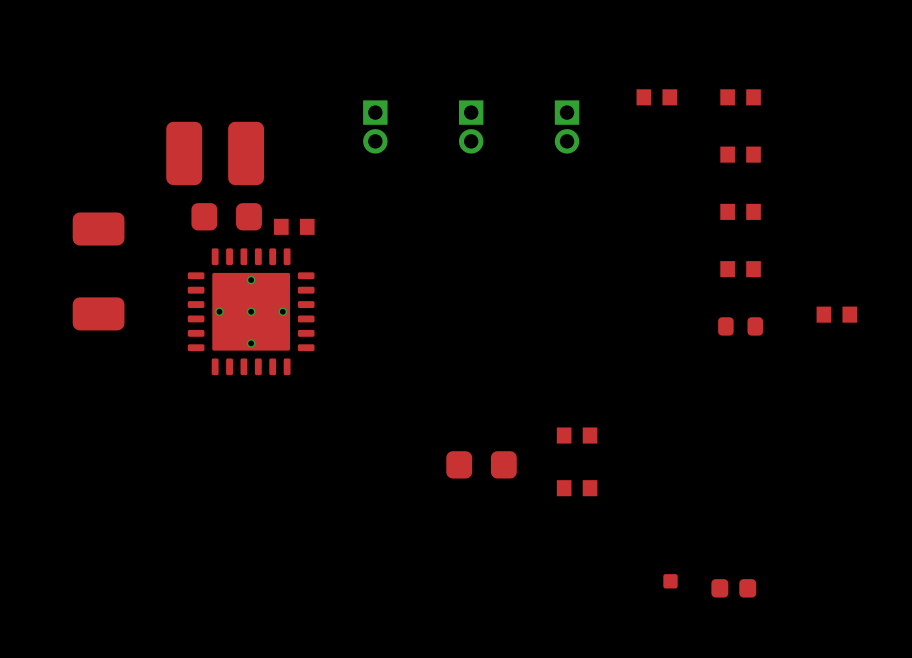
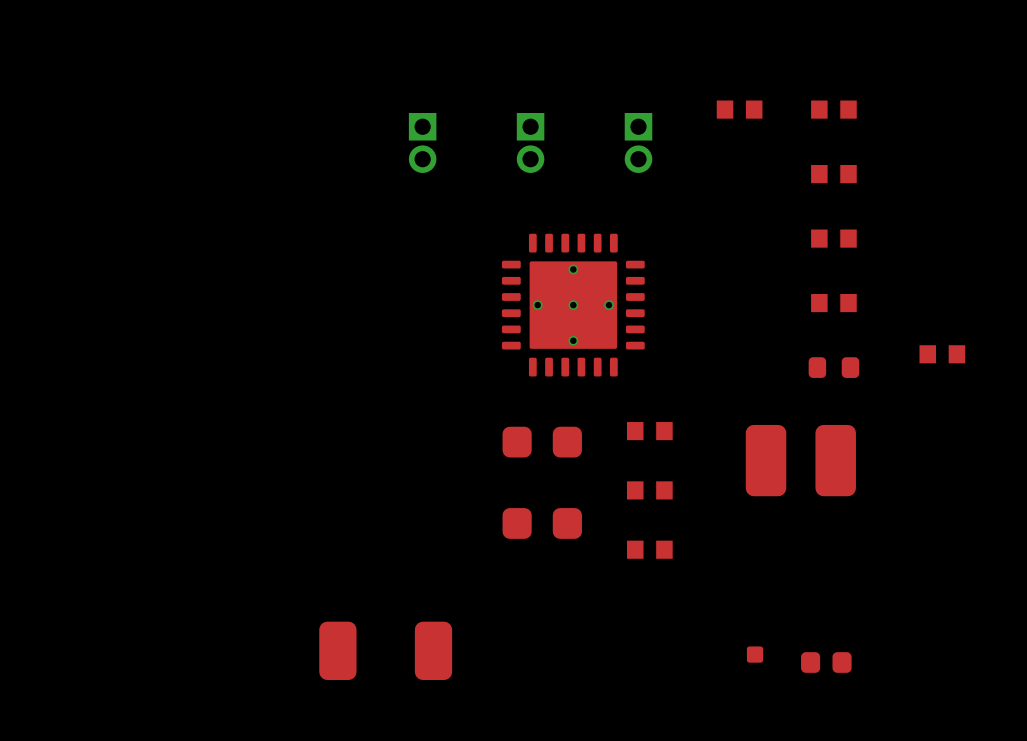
part position: (215, 153) -> (800, 460)
part position: (226, 216) -> (542, 442)
part position: (294, 226) -> (649, 431)
part rotation: 0° (98, 271) -> 90° clockwise (385, 650)
part position: (98, 271) -> (385, 650)
part position: (251, 311) -> (573, 305)

